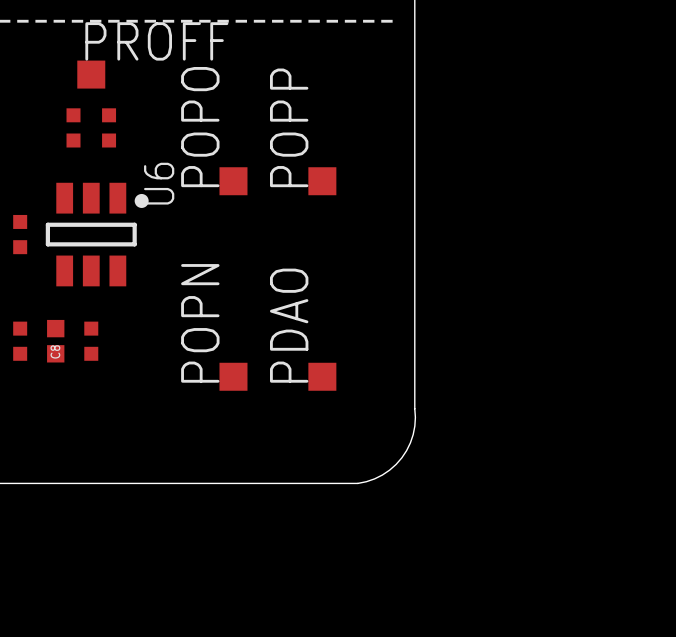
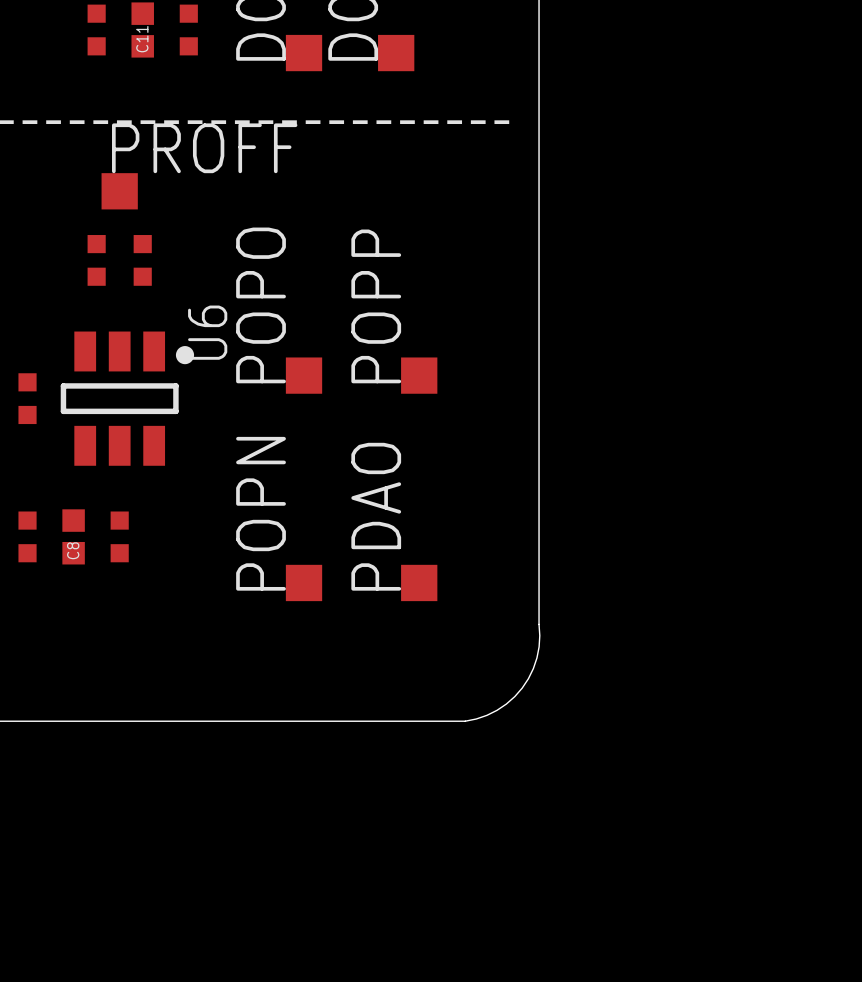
POPO position: (233, 181) -> (304, 375)
POPP position: (322, 181) -> (419, 375)

